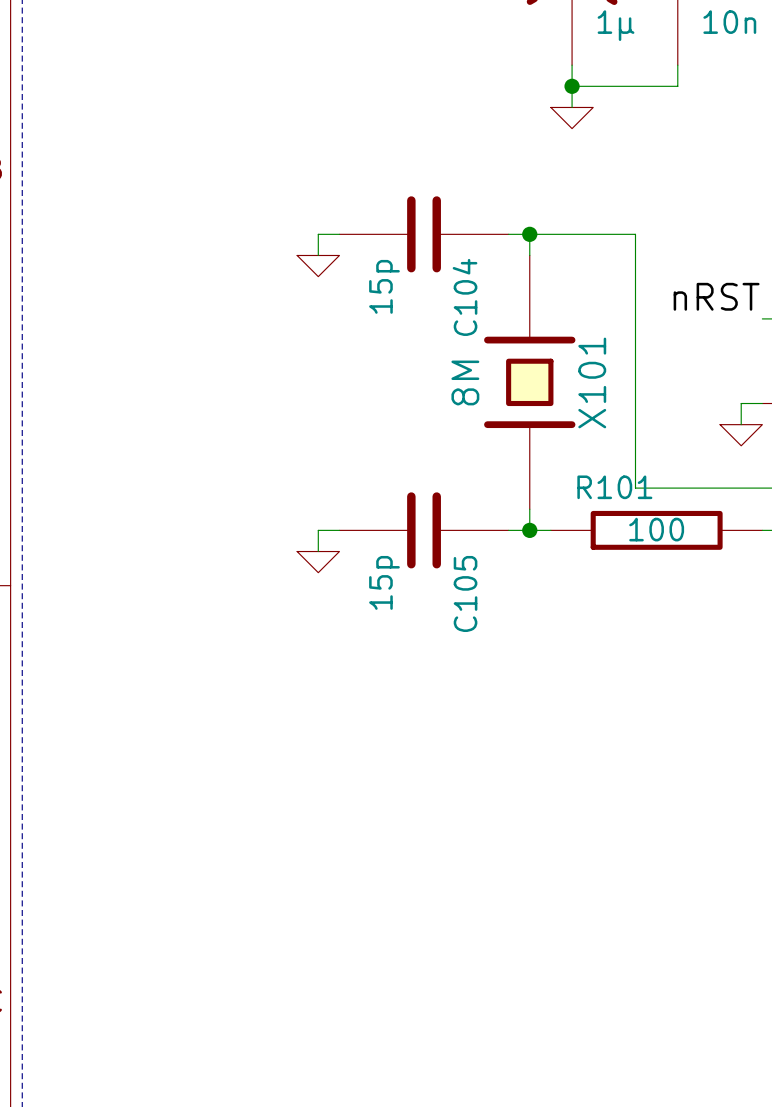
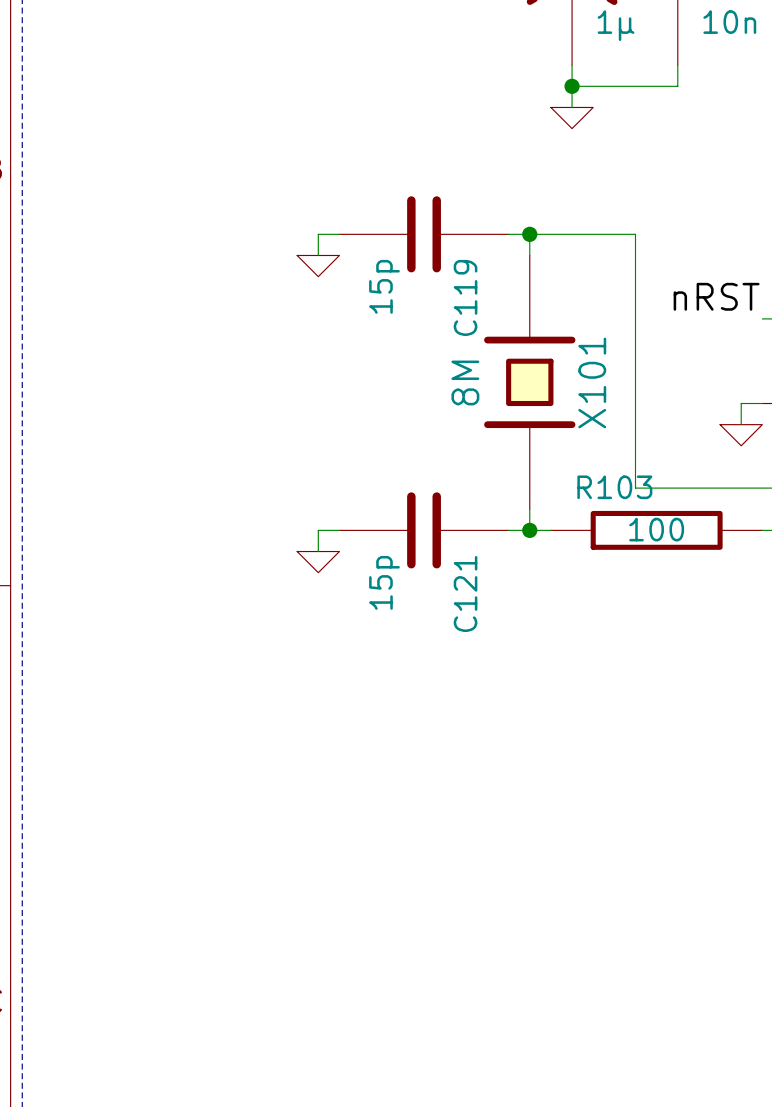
C104 name: C104 (465, 297) -> C119 (465, 297)
R101 name: R101 (614, 487) -> R103 (614, 487)
C105 name: C105 (465, 593) -> C121 (465, 593)

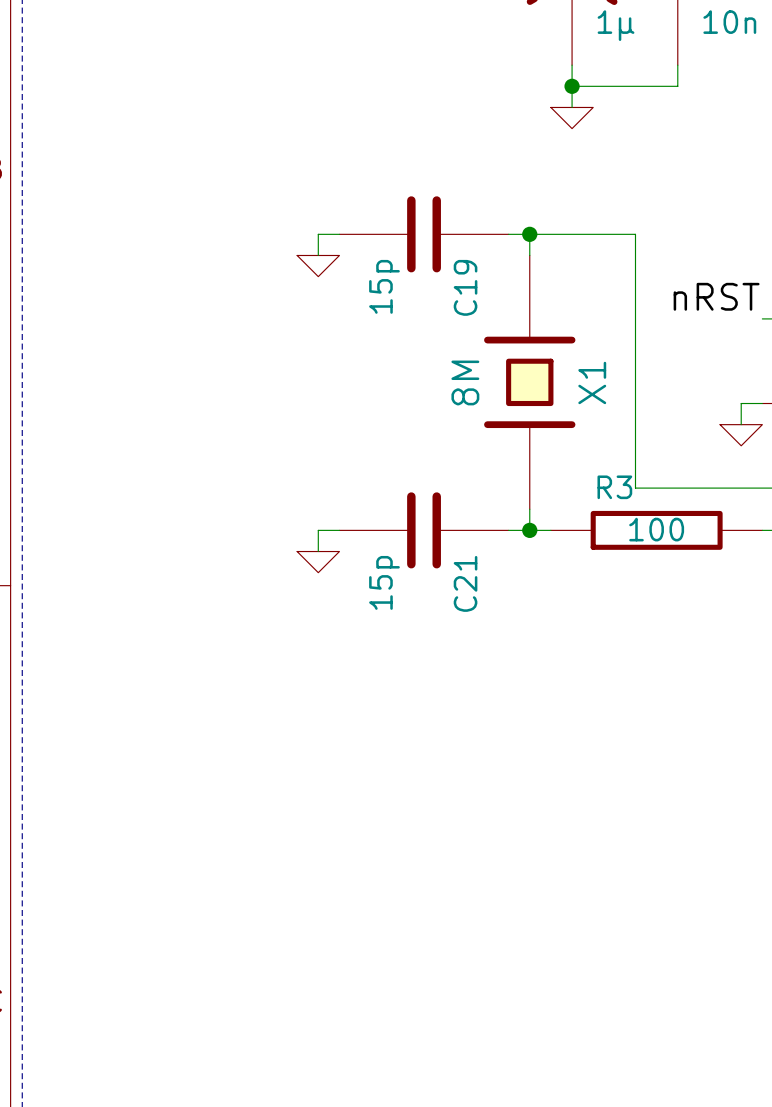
C119 name: C119 (465, 297) -> C19 (465, 287)
X101 name: X101 (592, 382) -> X1 (592, 382)
R103 name: R103 (614, 487) -> R3 (614, 487)
C121 name: C121 (465, 593) -> C21 (465, 583)

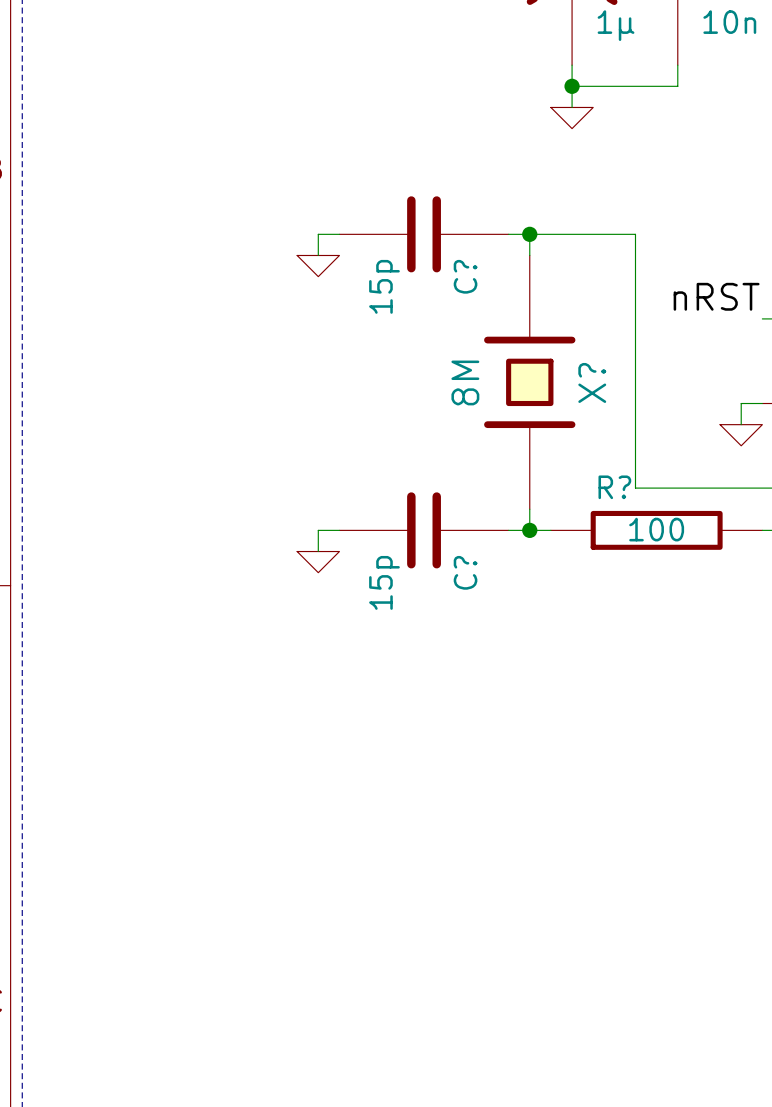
C19 name: C19 (465, 287) -> C? (465, 276)
X1 name: X1 (592, 382) -> X? (592, 382)
R3 name: R3 (614, 487) -> R? (614, 487)
C21 name: C21 (465, 583) -> C? (465, 572)

